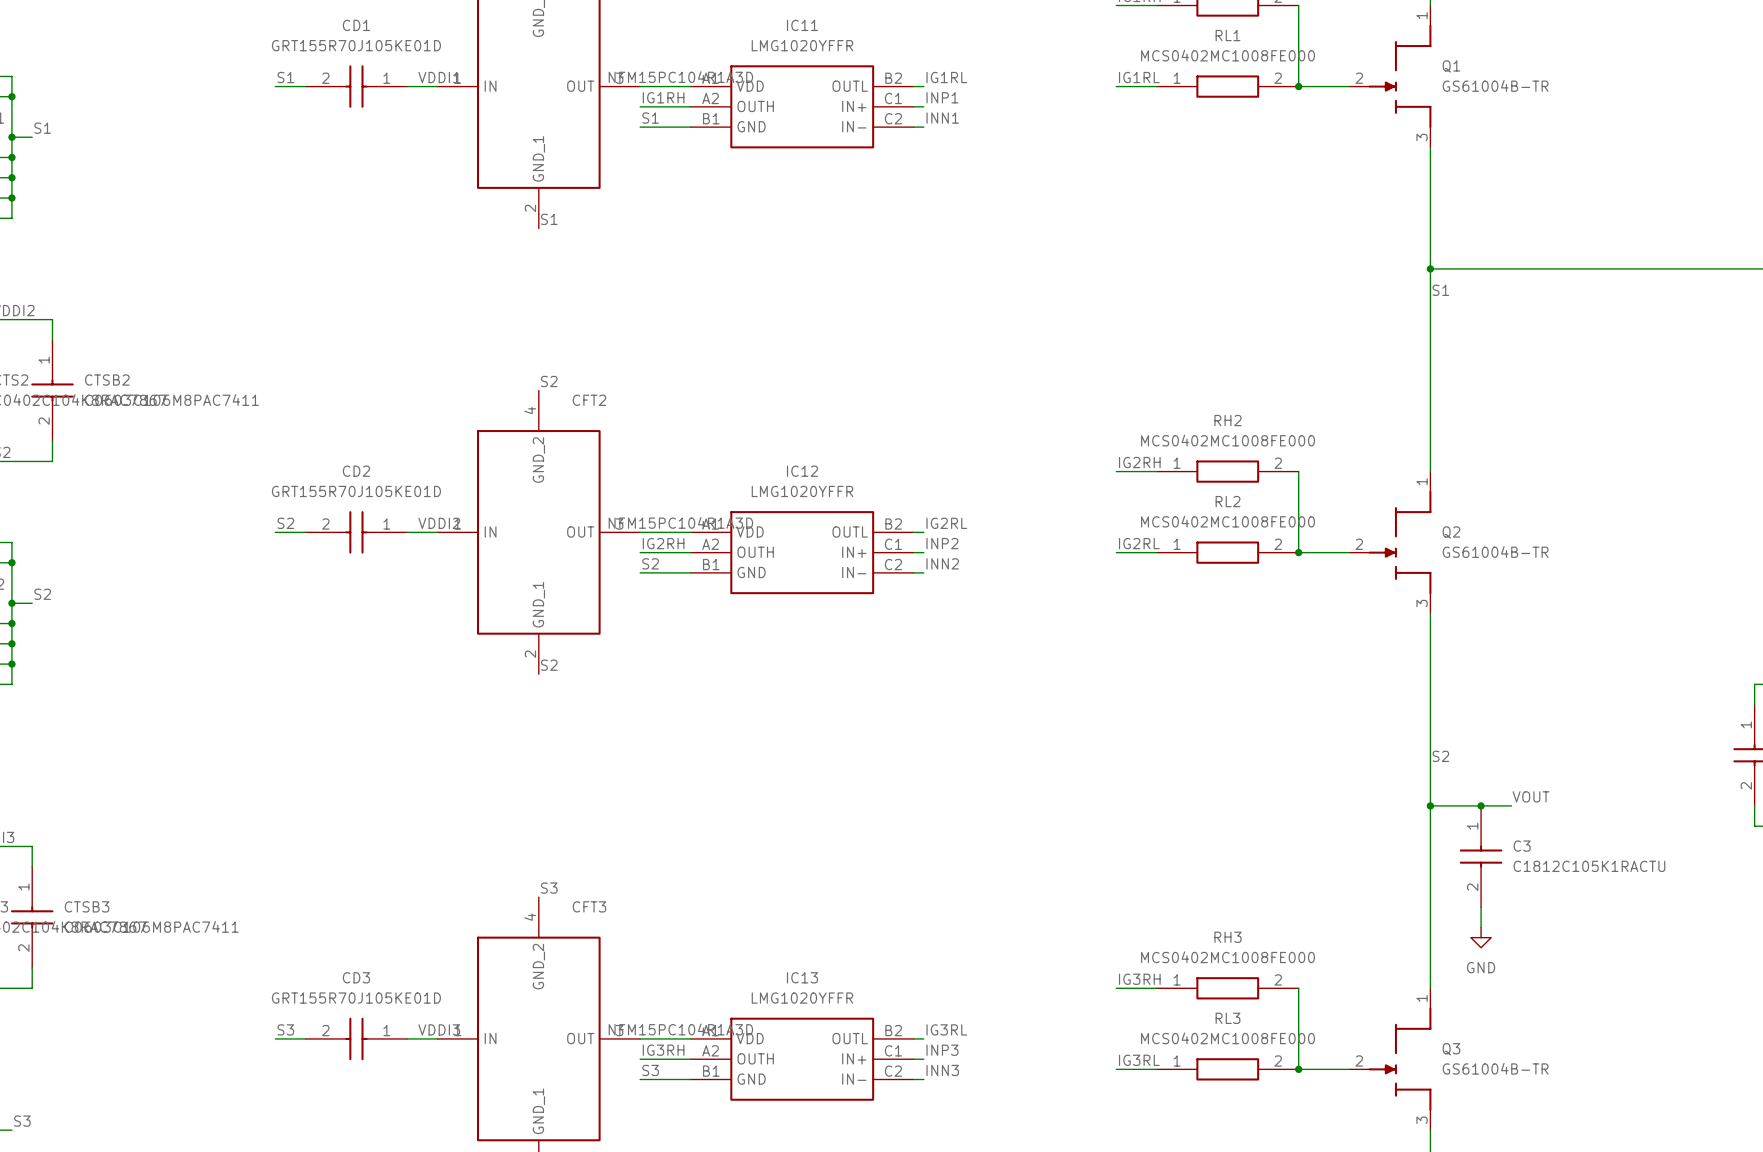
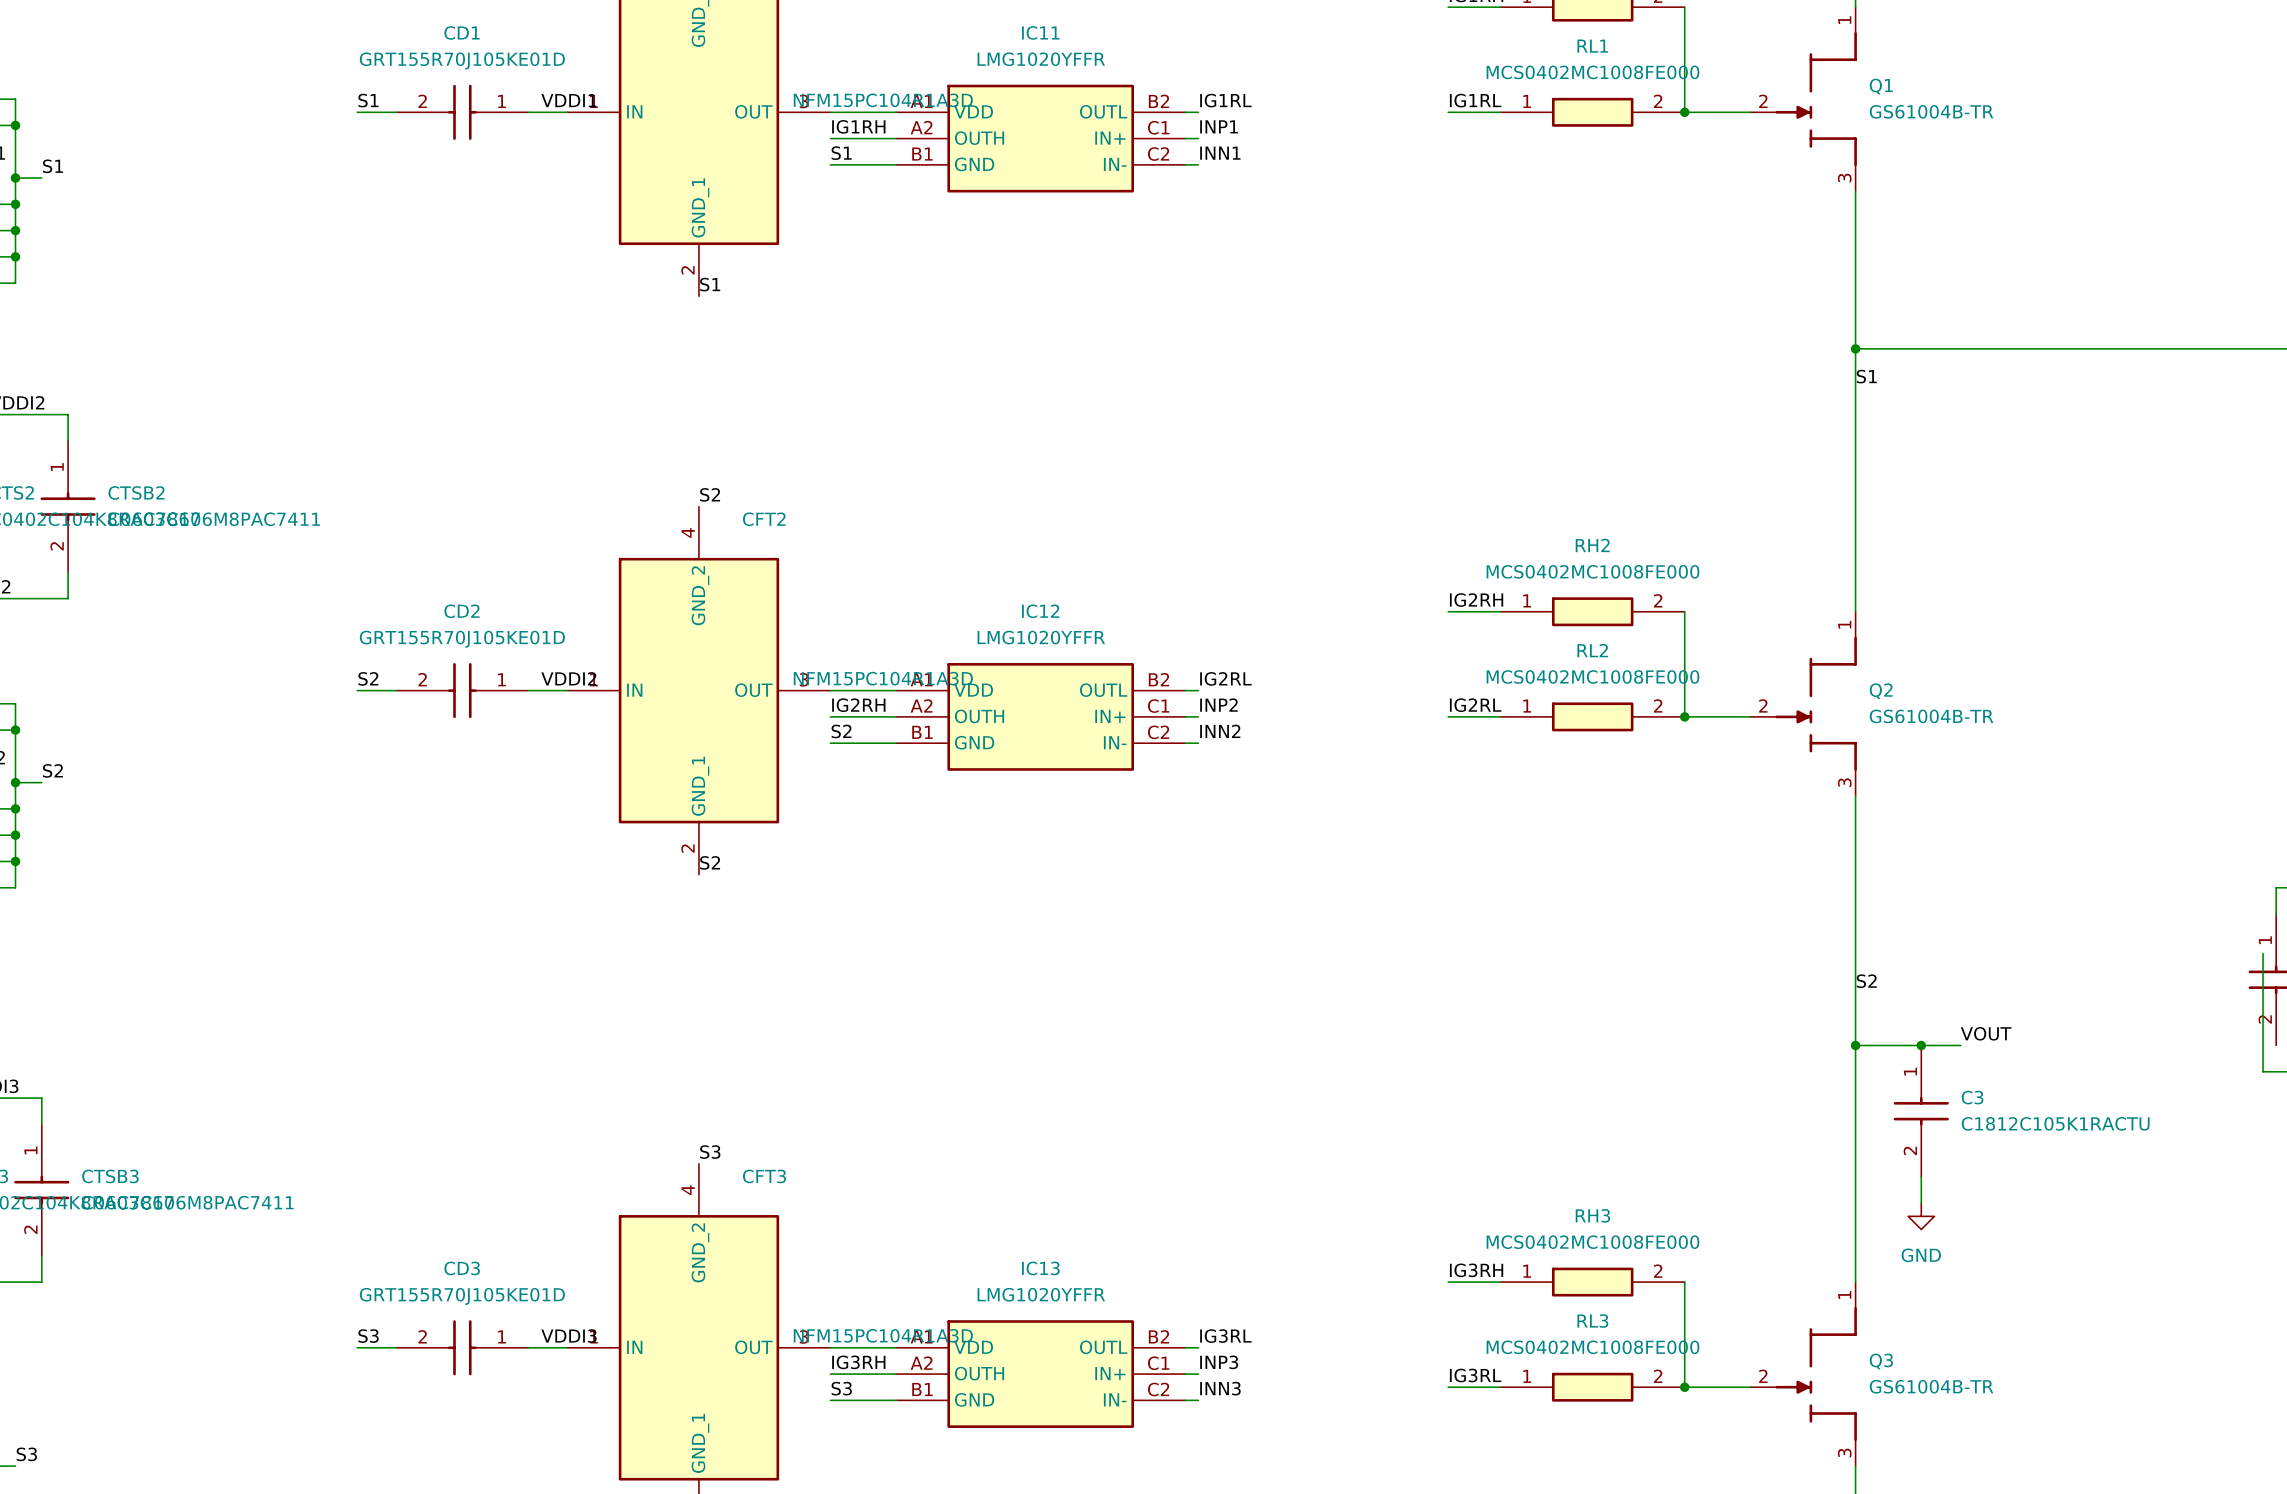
wire: (1754, 805) (1754, 826) -> (2263, 953) (2263, 1071) (2276, 1071)

